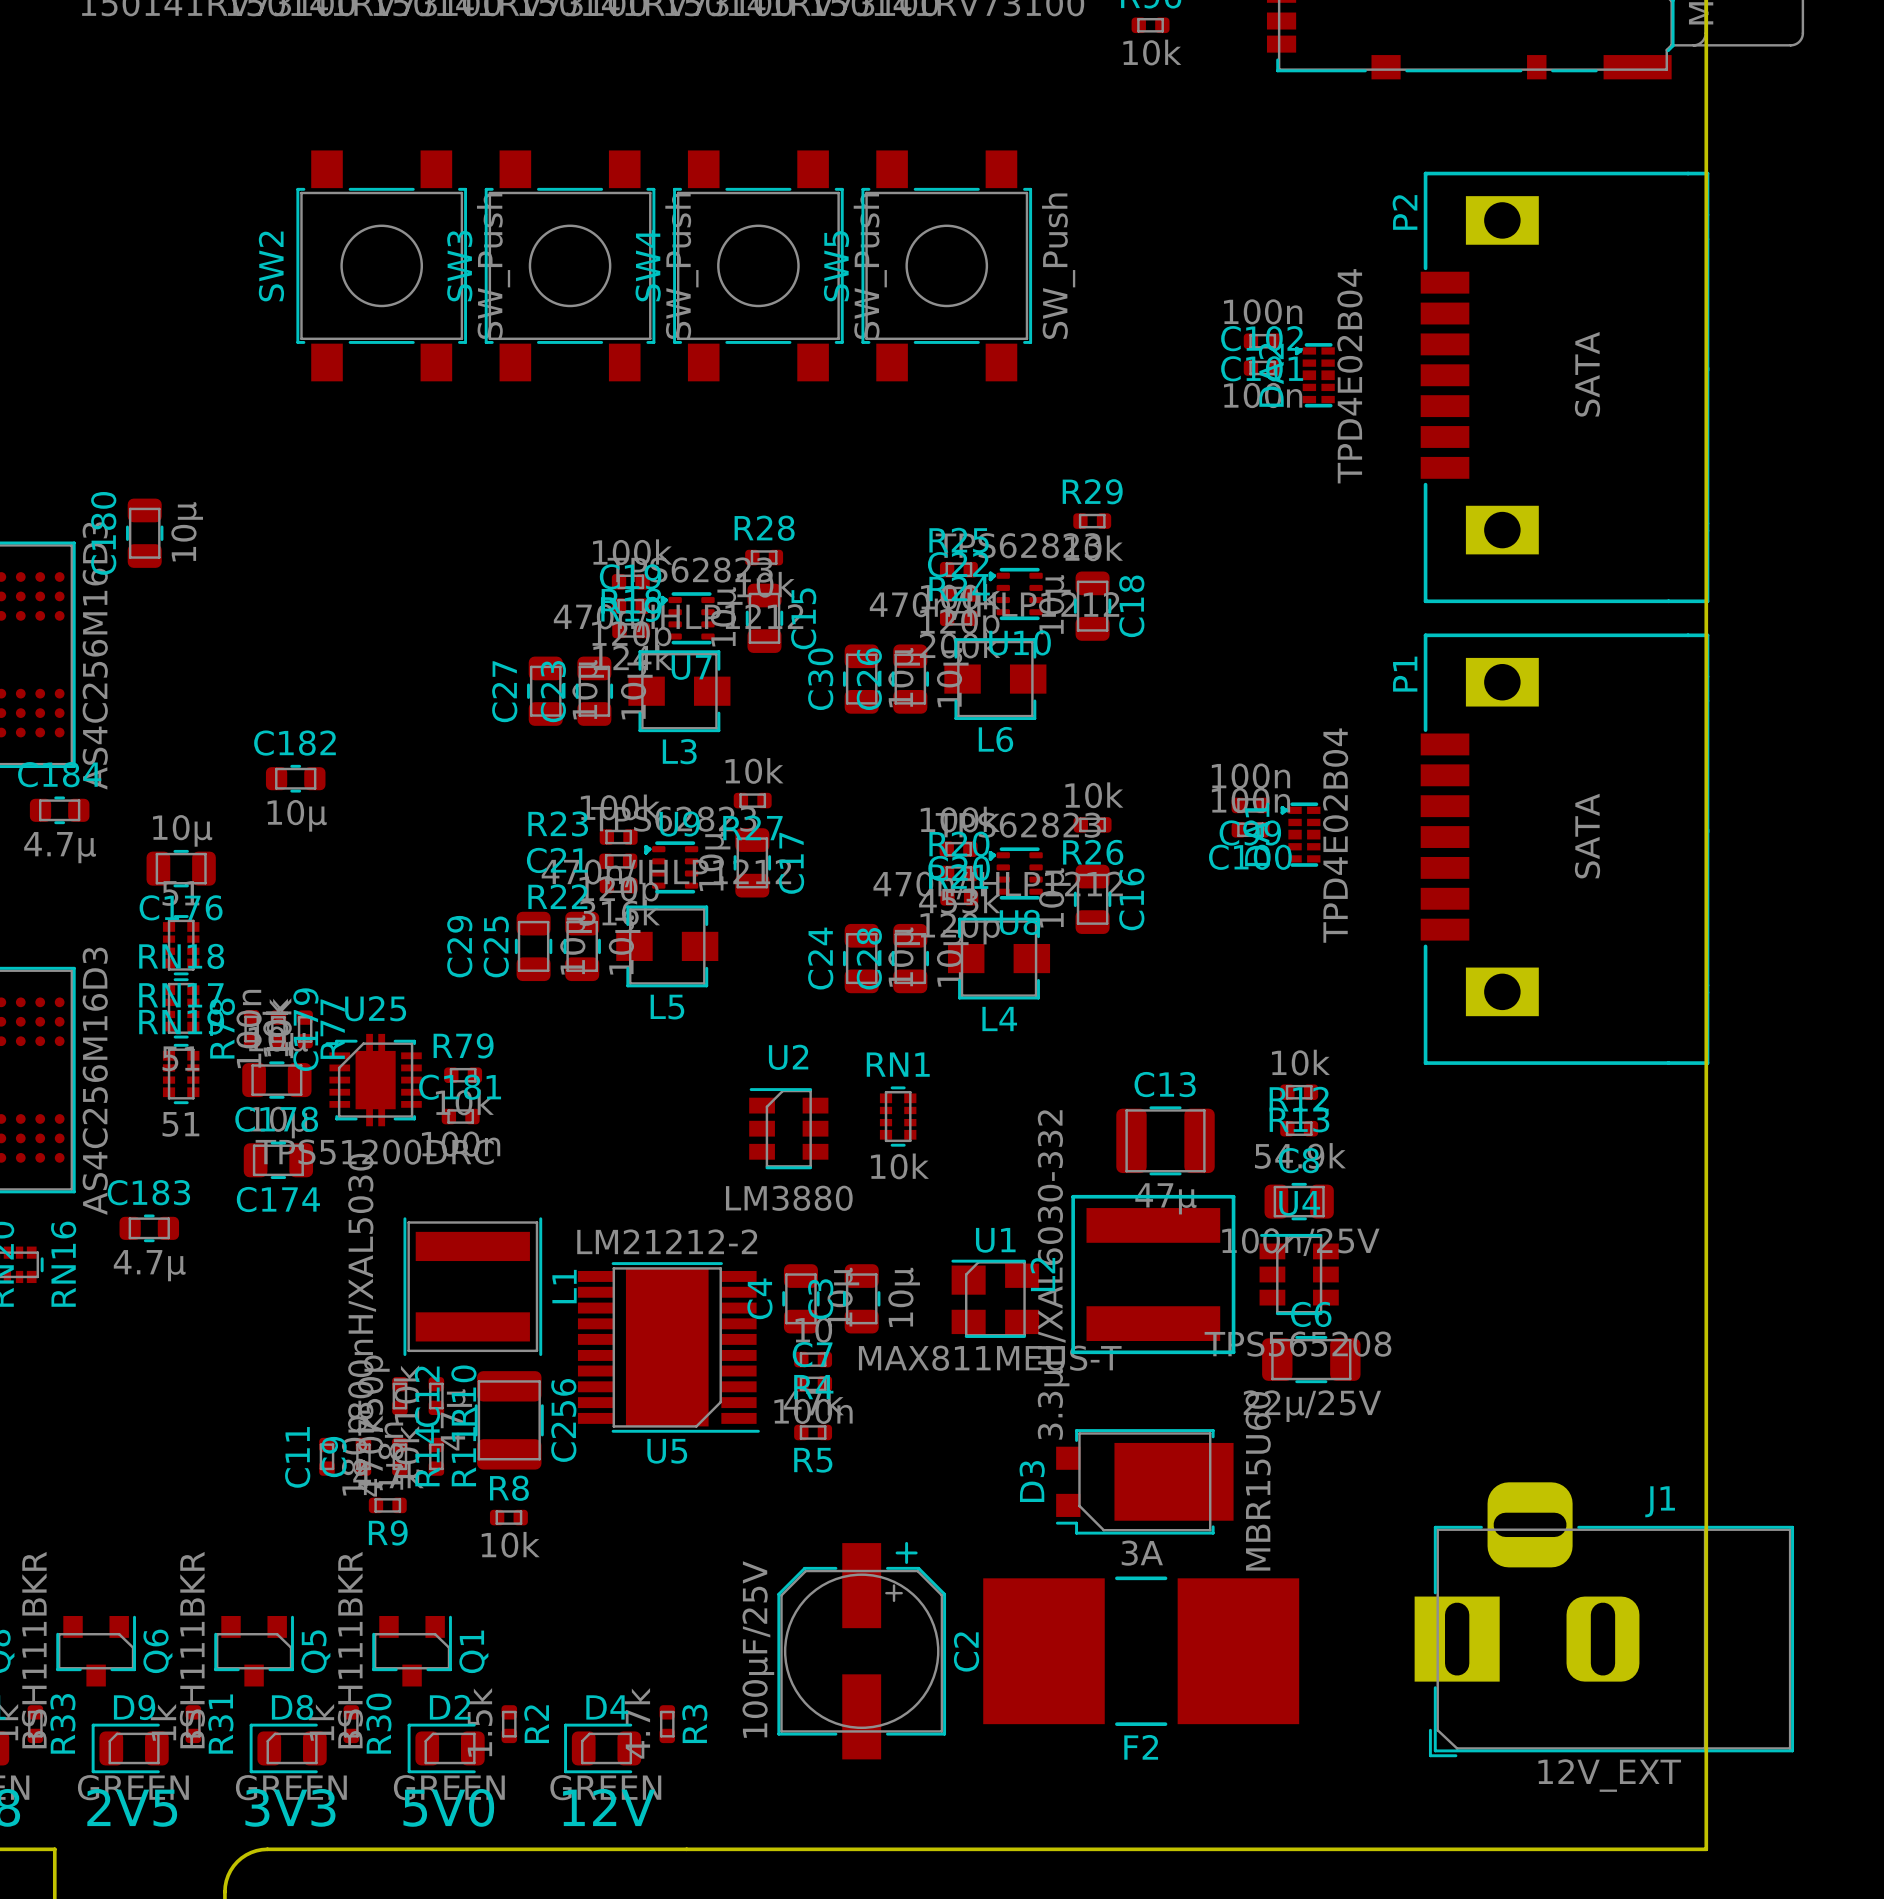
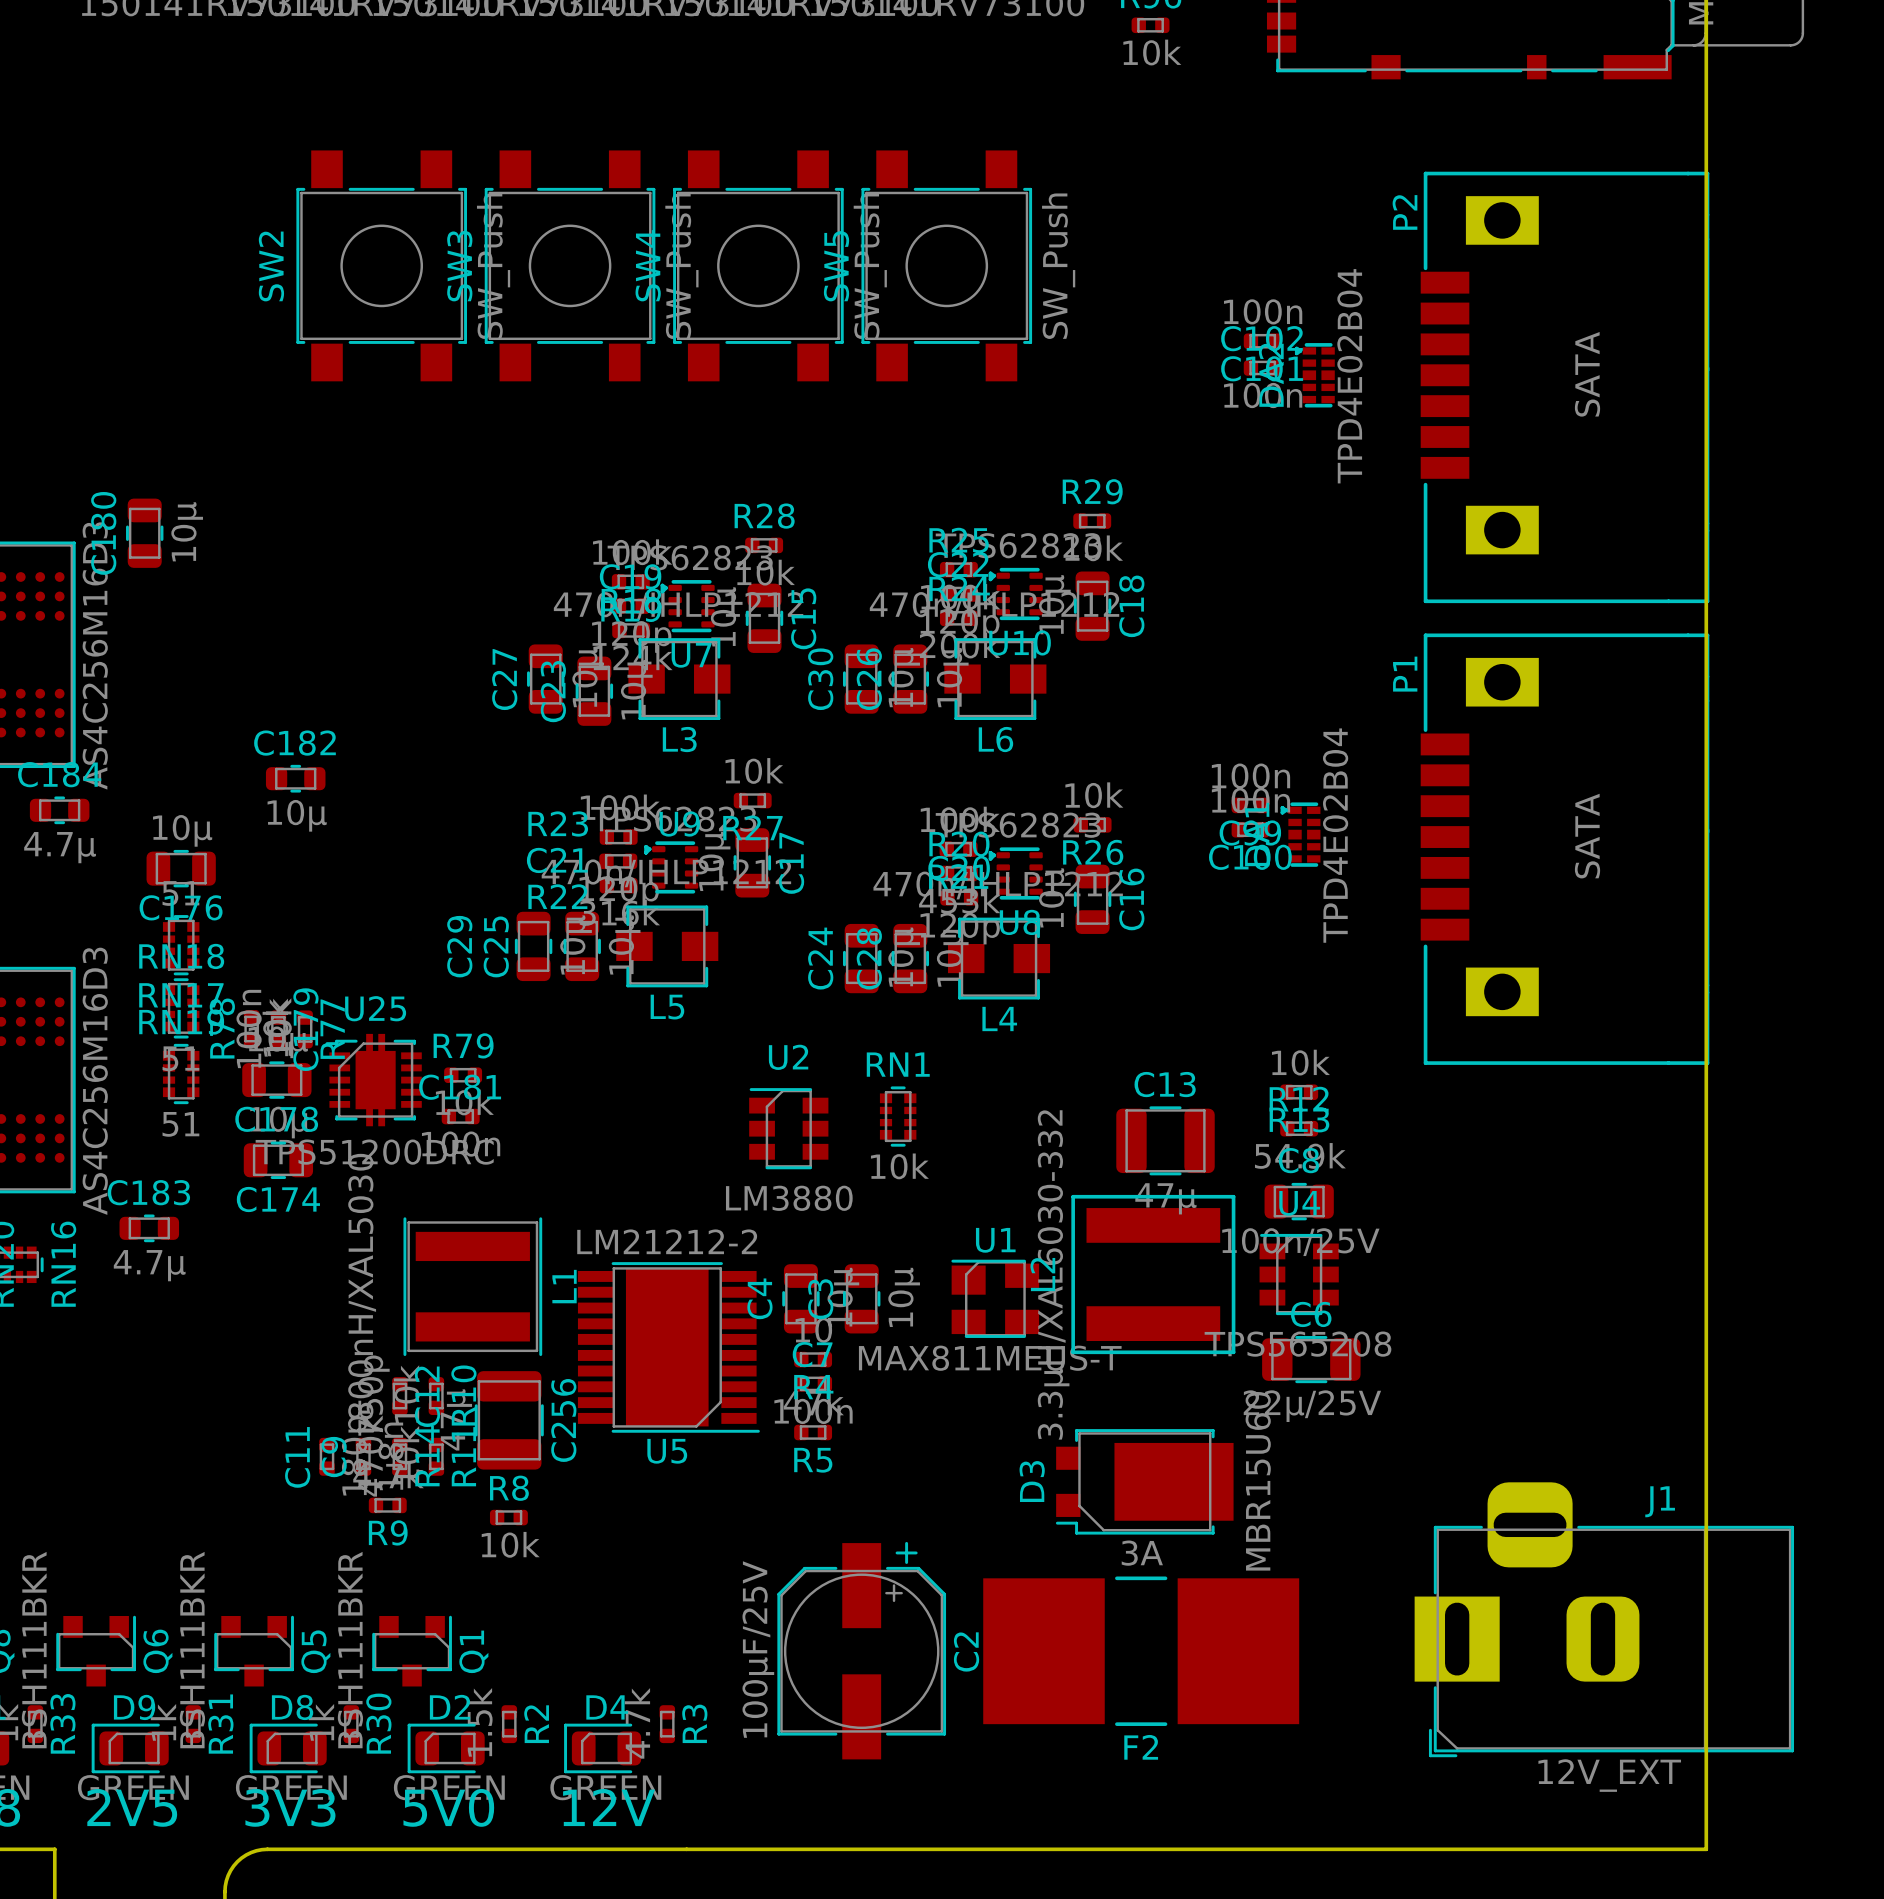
R28 position: (764, 557) -> (764, 545)
U7 position: (687, 618) -> (687, 606)
C27 position: (545, 691) -> (545, 679)
L3 position: (679, 691) -> (679, 679)

